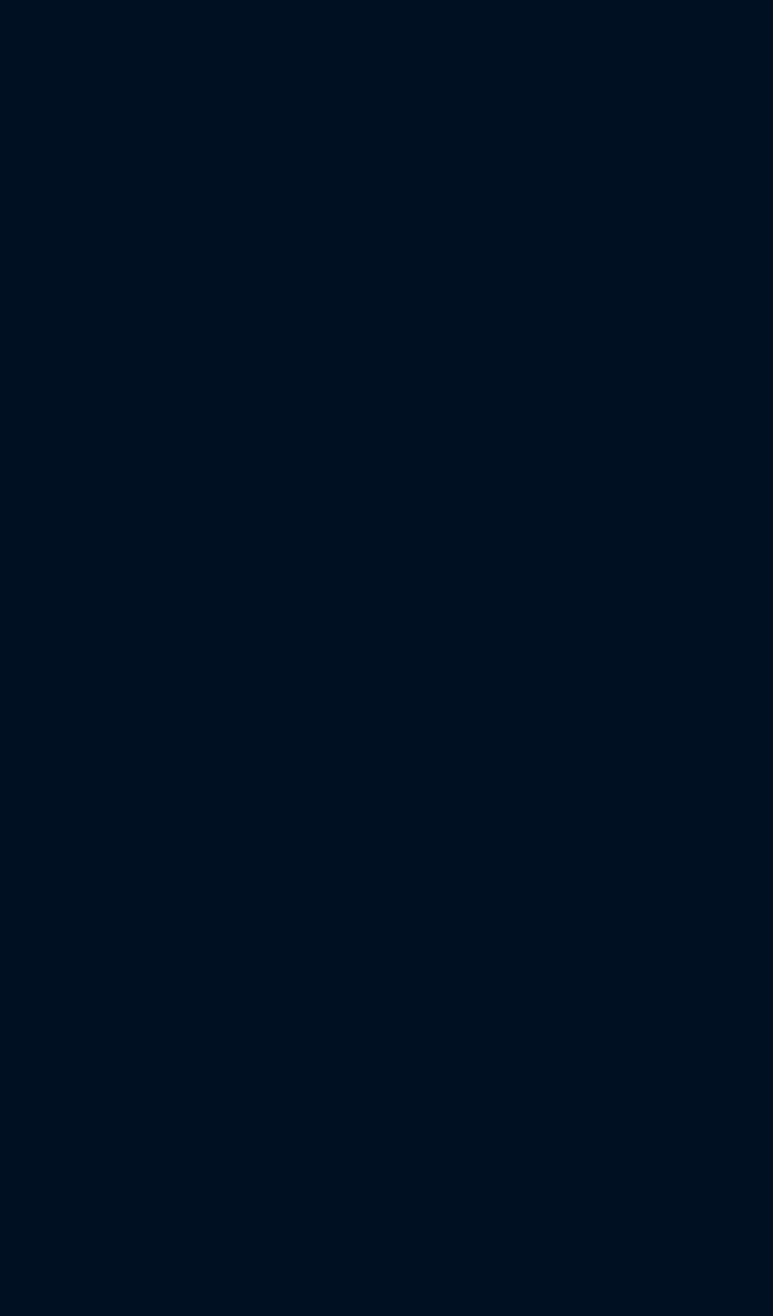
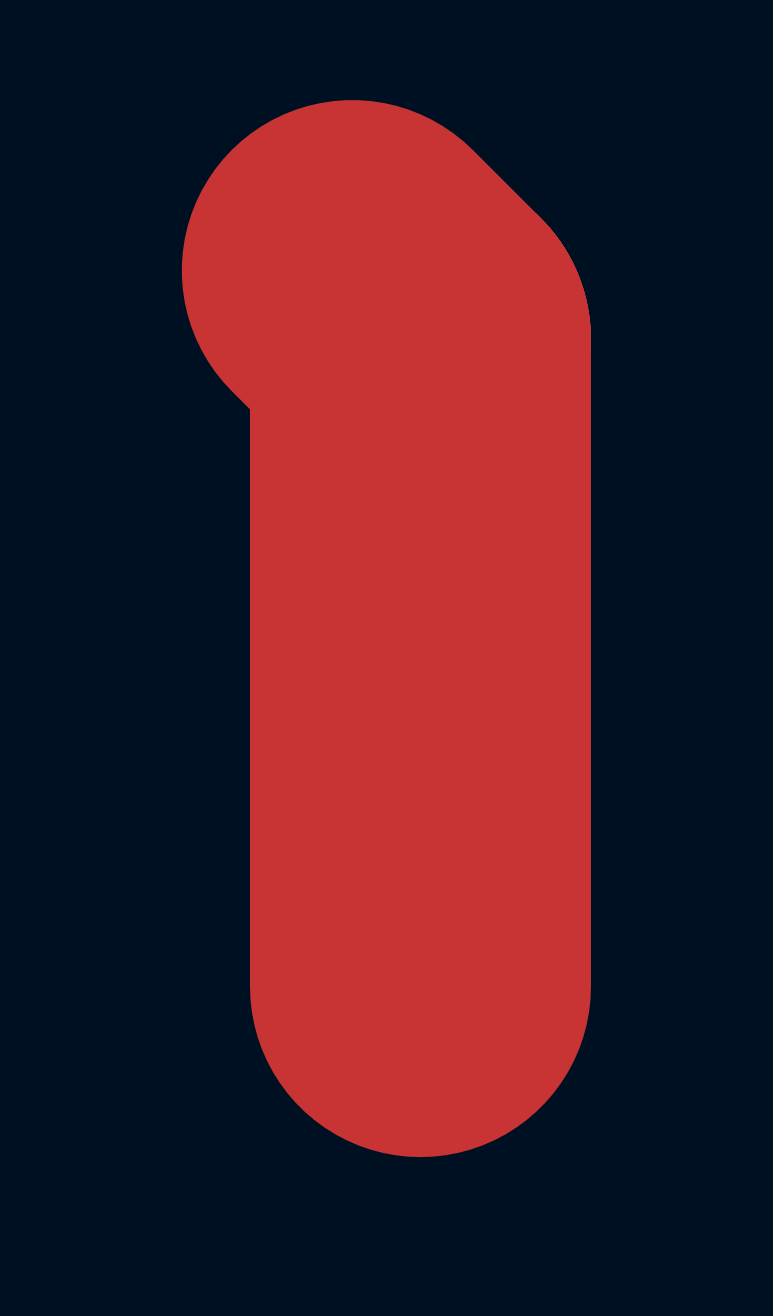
top track: none -> (352, 270) (420, 338) (420, 986)

